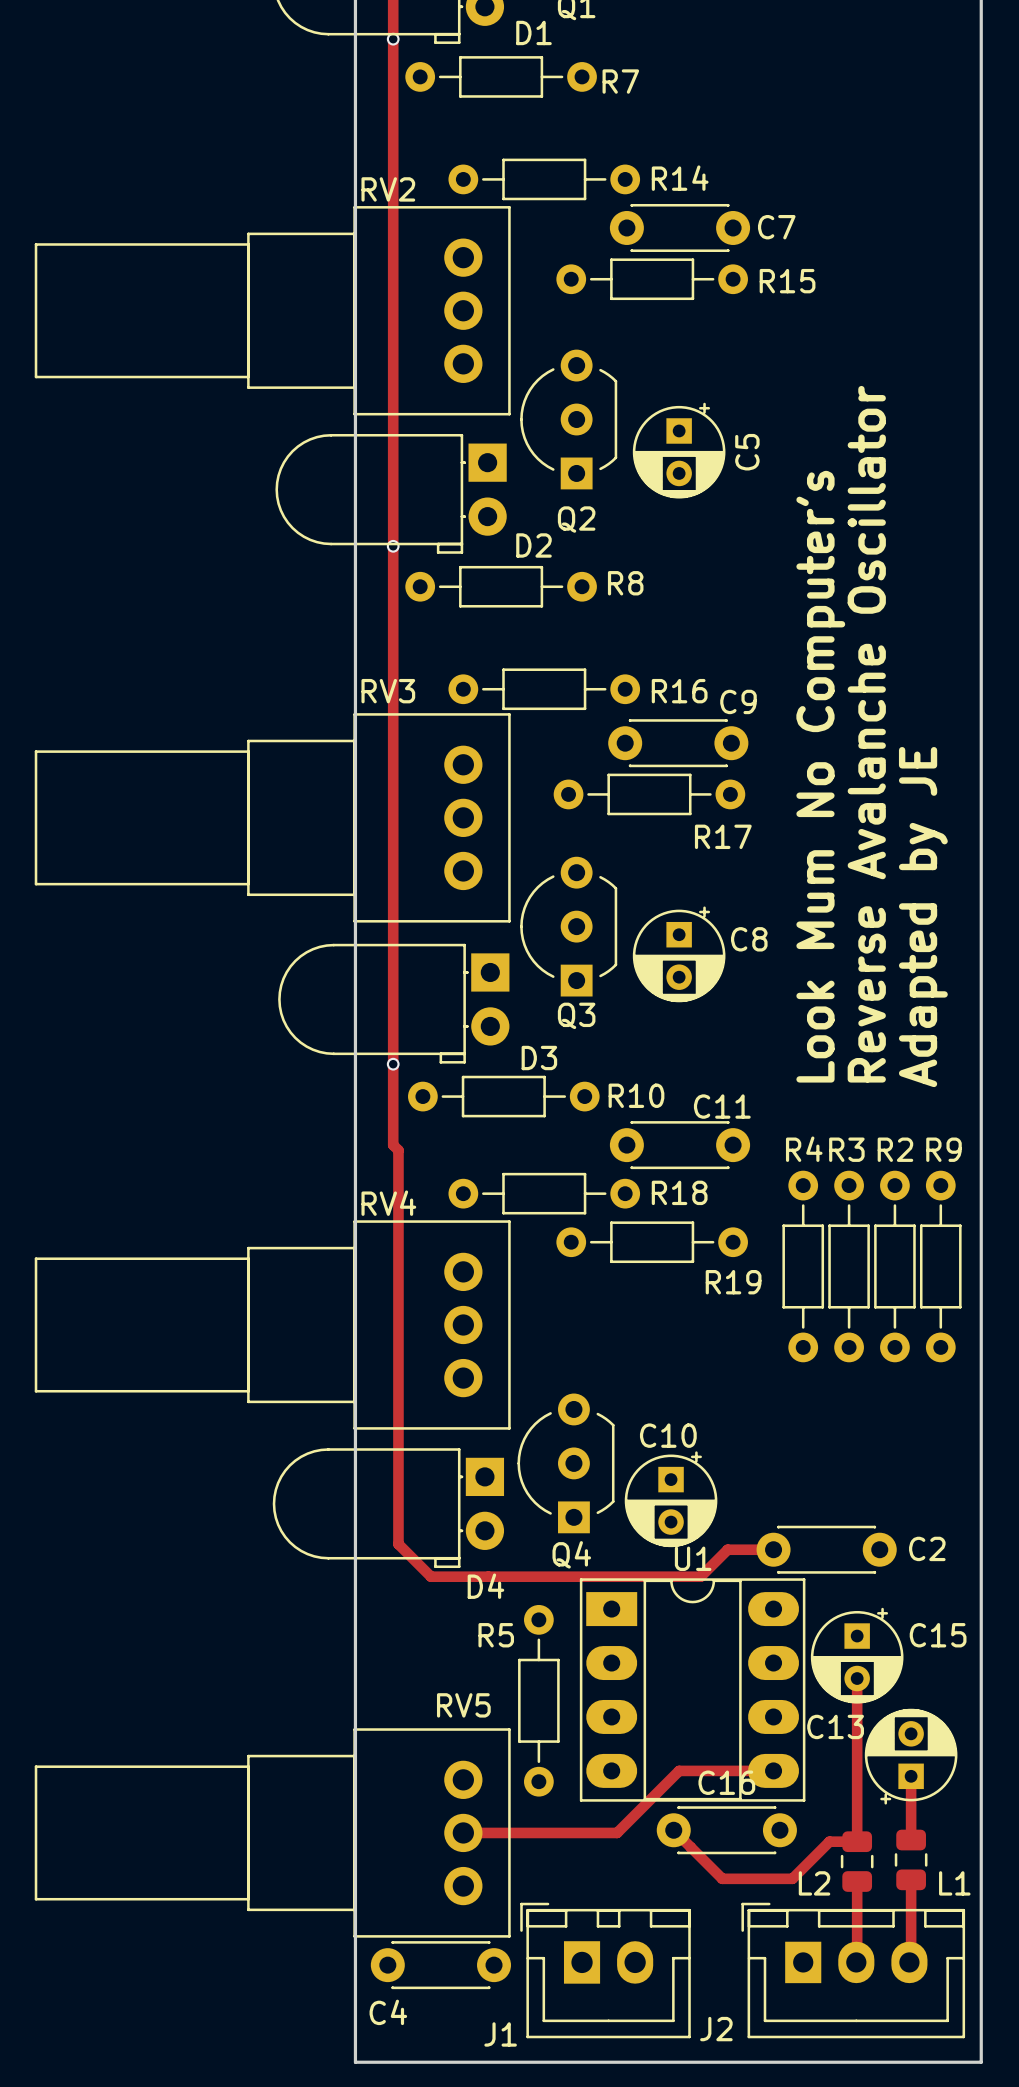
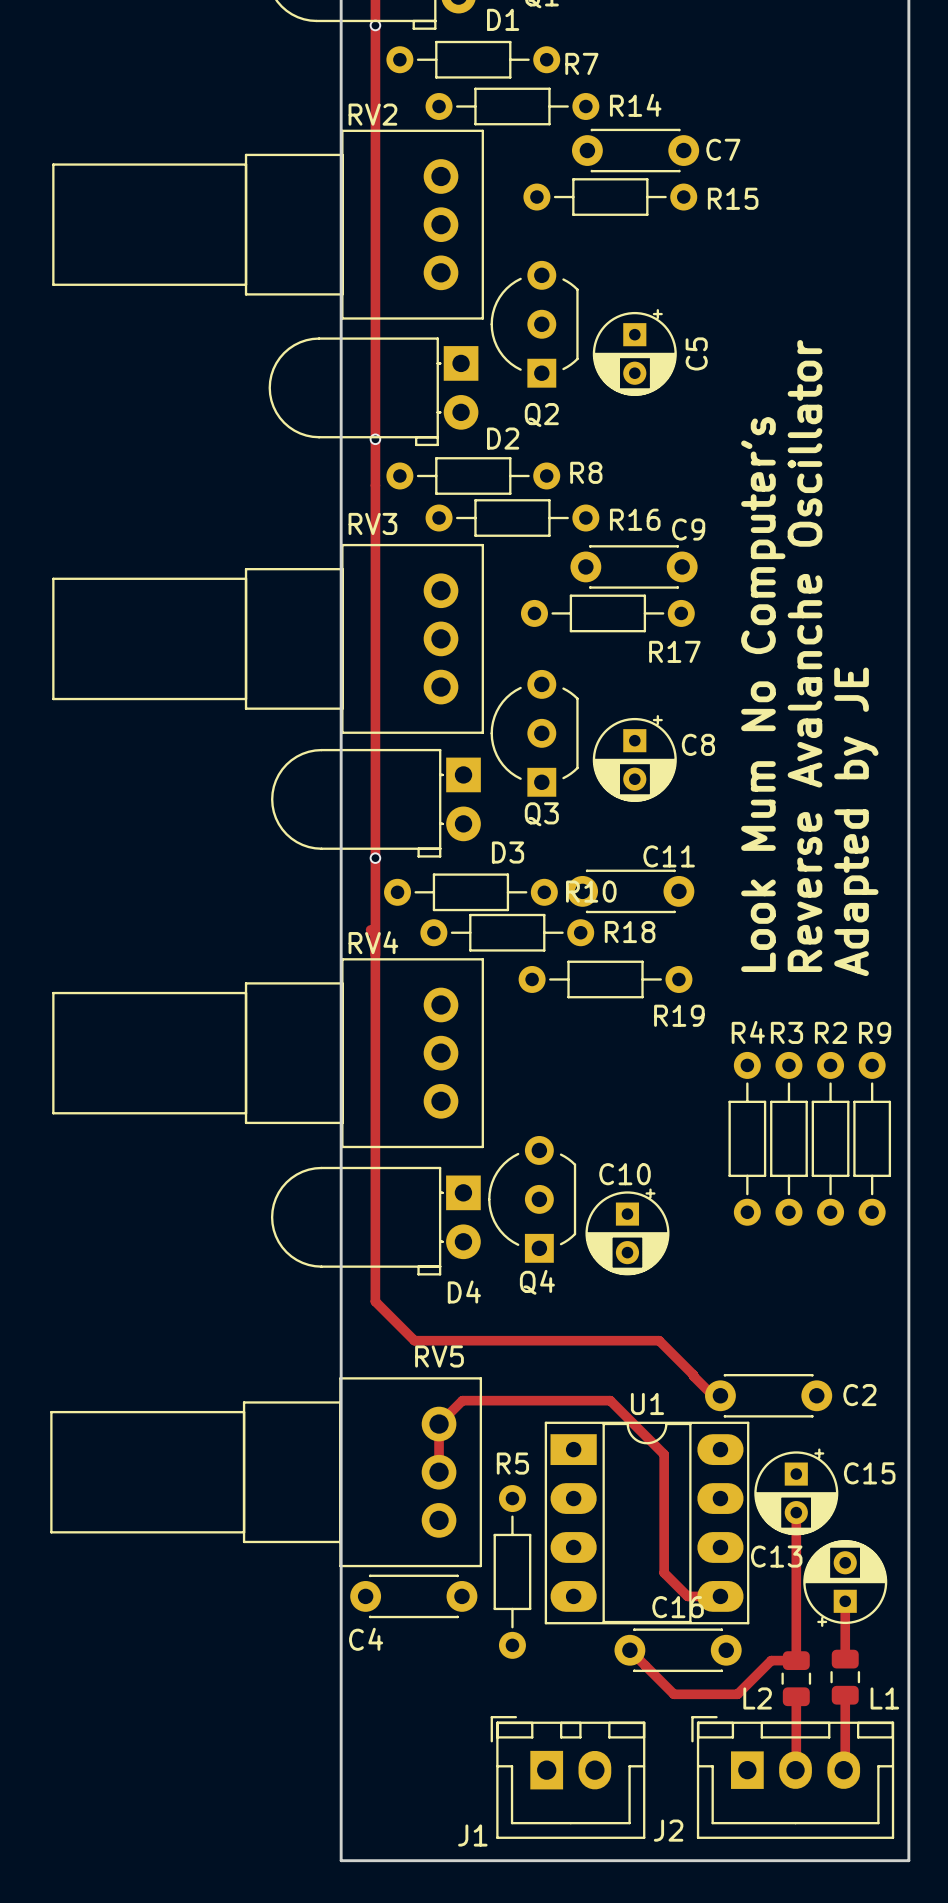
R14 position: (544, 179) -> (512, 106)
C7 position: (679, 227) -> (635, 150)
R15 position: (652, 279) -> (610, 197)
RV2 position: (272, 310) -> (268, 224)
Q2 position: (568, 419) -> (534, 324)
C5 position: (679, 450) -> (634, 352)
D2 position: (391, 493) -> (373, 391)
via position: (393, 546) -> (375, 439)
R8 position: (501, 586) -> (473, 475)
R16 position: (544, 689) -> (512, 518)
C9 position: (678, 743) -> (634, 566)
R17 position: (649, 794) -> (607, 613)
RV3 position: (272, 817) -> (268, 638)
Q3 position: (568, 926) -> (534, 733)
C8 position: (679, 954) -> (634, 758)
D3 position: (393, 1003) -> (375, 803)
track: (393, 1064) (393, 1145) (398, 1150) (398, 1544) (430, 1576) (700, 1576) (727, 1549) (765, 1549) -> (370, 929) (375, 934) (375, 1301) (414, 1340) (659, 1340) (713, 1395)
via position: (393, 1064) -> (375, 858)
R10 position: (503, 1096) -> (470, 892)
C11 position: (679, 1145) -> (630, 891)
R18 position: (544, 1193) -> (507, 932)
R19 position: (652, 1242) -> (605, 979)
RV4 position: (272, 1324) -> (268, 1053)
Q4 position: (565, 1463) -> (532, 1199)
C10 position: (671, 1499) -> (627, 1231)
D4 position: (388, 1508) -> (375, 1221)
R5 name position: R5 (496, 1635) -> R5 (512, 1463)
R5 position: (538, 1700) -> (512, 1571)
track: (737, 1770) (679, 1770) (617, 1832) (463, 1832) -> (687, 1596) (664, 1572) (664, 1454) (610, 1400) (462, 1400) (439, 1424) (439, 1472)
RV5 position: (272, 1832) -> (266, 1472)
C4 position: (440, 1965) -> (413, 1596)

